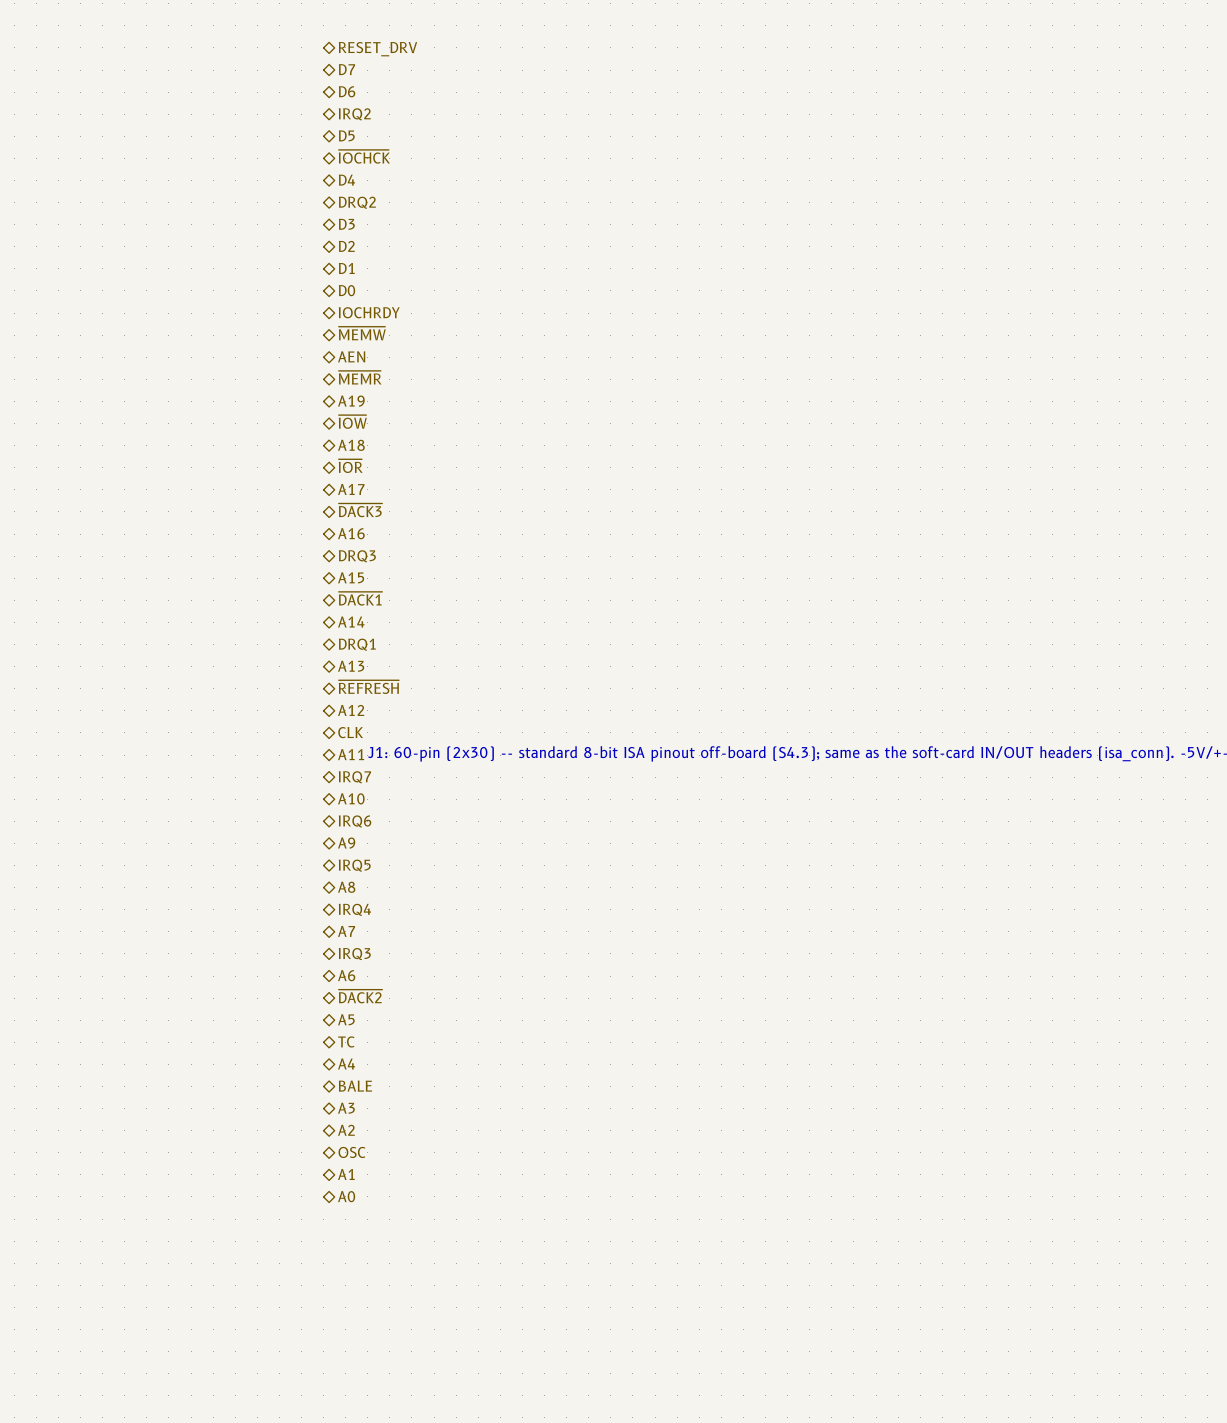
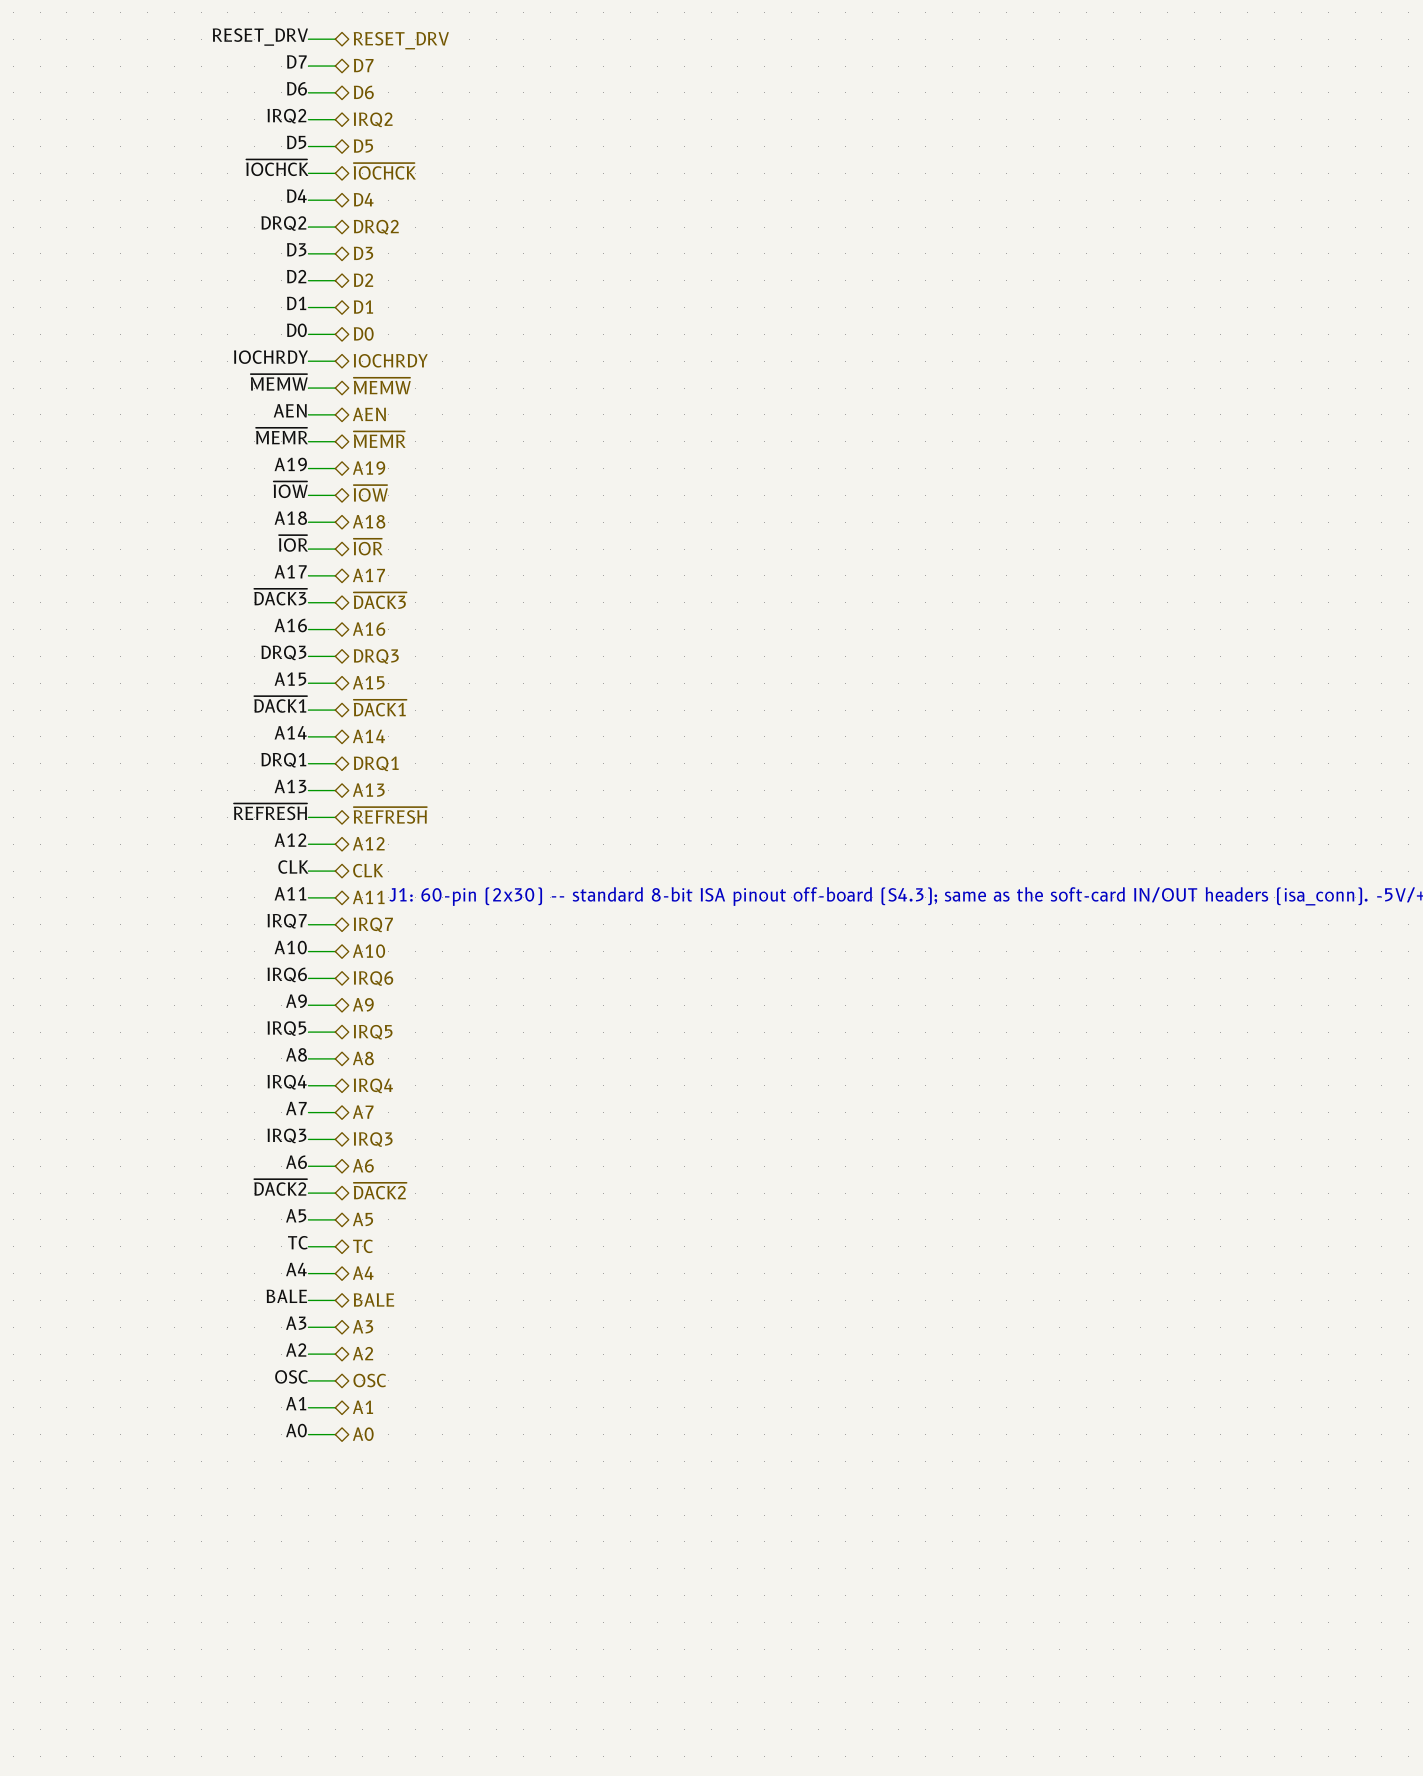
label: none -> RESET_DRV (260, 37)
wire: none -> (308, 39) (335, 39)
label: none -> D7 (296, 61)
wire: none -> (308, 66) (335, 66)
label: none -> D6 (296, 88)
wire: none -> (308, 92) (335, 92)
label: none -> IRQ2 (286, 116)
wire: none -> (308, 119) (335, 119)
label: none -> D5 (296, 142)
wire: none -> (308, 146) (335, 146)
label: none -> ~{IOCHCK} (277, 167)
wire: none -> (308, 173) (335, 173)
label: none -> D4 (296, 196)
wire: none -> (308, 200) (335, 200)
label: none -> DRQ2 (283, 223)
wire: none -> (308, 227) (335, 227)
label: none -> D3 (296, 249)
wire: none -> (308, 253) (335, 253)
label: none -> D2 (296, 276)
wire: none -> (308, 280) (335, 280)
label: none -> D1 (296, 303)
wire: none -> (308, 307) (335, 307)
label: none -> D0 (296, 330)
wire: none -> (308, 334) (335, 334)
label: none -> IOCHRDY (270, 357)
wire: none -> (308, 361) (335, 361)
label: none -> ~{MEMW} (279, 382)
wire: none -> (308, 388) (335, 388)
label: none -> AEN (290, 410)
wire: none -> (308, 414) (335, 414)
label: none -> ~{MEMR} (281, 436)
wire: none -> (308, 441) (335, 441)
label: none -> A19 (290, 464)
wire: none -> (308, 468) (335, 468)
label: none -> ~{IOW} (290, 489)
wire: none -> (308, 495) (335, 495)
label: none -> A18 (290, 518)
wire: none -> (308, 522) (335, 522)
label: none -> ~{IOR} (293, 543)
wire: none -> (308, 549) (335, 549)
label: none -> A17 (290, 571)
wire: none -> (308, 575) (335, 575)
label: none -> ~{DACK3} (280, 597)
wire: none -> (308, 602) (335, 602)
label: none -> A16 (290, 625)
wire: none -> (308, 629) (335, 629)
label: none -> DRQ3 (283, 652)
wire: none -> (308, 656) (335, 656)
label: none -> A15 (290, 679)
wire: none -> (308, 683) (335, 683)
label: none -> ~{DACK1} (280, 704)
wire: none -> (308, 710) (335, 710)
label: none -> A14 (290, 732)
wire: none -> (308, 736) (335, 736)
label: none -> DRQ1 (283, 760)
wire: none -> (308, 763) (335, 763)
label: none -> A13 (290, 786)
wire: none -> (308, 790) (335, 790)
label: none -> ~{REFRESH} (270, 811)
wire: none -> (308, 817) (335, 817)
label: none -> A12 (290, 840)
wire: none -> (308, 844) (335, 844)
label: none -> CLK (293, 867)
wire: none -> (308, 871) (335, 871)
label: none -> A11 (290, 893)
wire: none -> (308, 897) (335, 897)
label: none -> IRQ7 (287, 921)
wire: none -> (308, 924) (335, 924)
label: none -> A10 (290, 947)
wire: none -> (308, 951) (335, 951)
label: none -> IRQ6 (287, 974)
wire: none -> (308, 978) (335, 978)
label: none -> A9 (296, 1001)
wire: none -> (308, 1005) (335, 1005)
label: none -> IRQ5 (286, 1028)
wire: none -> (308, 1032) (335, 1032)
label: none -> A8 (296, 1054)
wire: none -> (308, 1058) (335, 1058)
label: none -> IRQ4 (287, 1082)
wire: none -> (308, 1085) (335, 1085)
label: none -> A7 (296, 1108)
wire: none -> (308, 1112) (335, 1112)
label: none -> IRQ3 (286, 1135)
wire: none -> (308, 1139) (335, 1139)
label: none -> A6 (296, 1162)
wire: none -> (308, 1166) (335, 1166)
label: none -> ~{DACK2} (280, 1187)
wire: none -> (308, 1193) (335, 1193)
label: none -> A5 (296, 1215)
wire: none -> (308, 1219) (335, 1219)
label: none -> TC (297, 1242)
wire: none -> (308, 1246) (335, 1246)
label: none -> A4 (296, 1269)
wire: none -> (308, 1273) (335, 1273)
label: none -> BALE (286, 1296)
wire: none -> (308, 1300) (335, 1300)
label: none -> A3 (296, 1323)
wire: none -> (308, 1327) (335, 1327)
label: none -> A2 (296, 1349)
wire: none -> (308, 1354) (335, 1354)
label: none -> OSC (291, 1376)
wire: none -> (308, 1380) (335, 1380)
label: none -> A1 (296, 1403)
wire: none -> (308, 1407) (335, 1407)
label: none -> A0 (296, 1430)
wire: none -> (308, 1434) (335, 1434)

